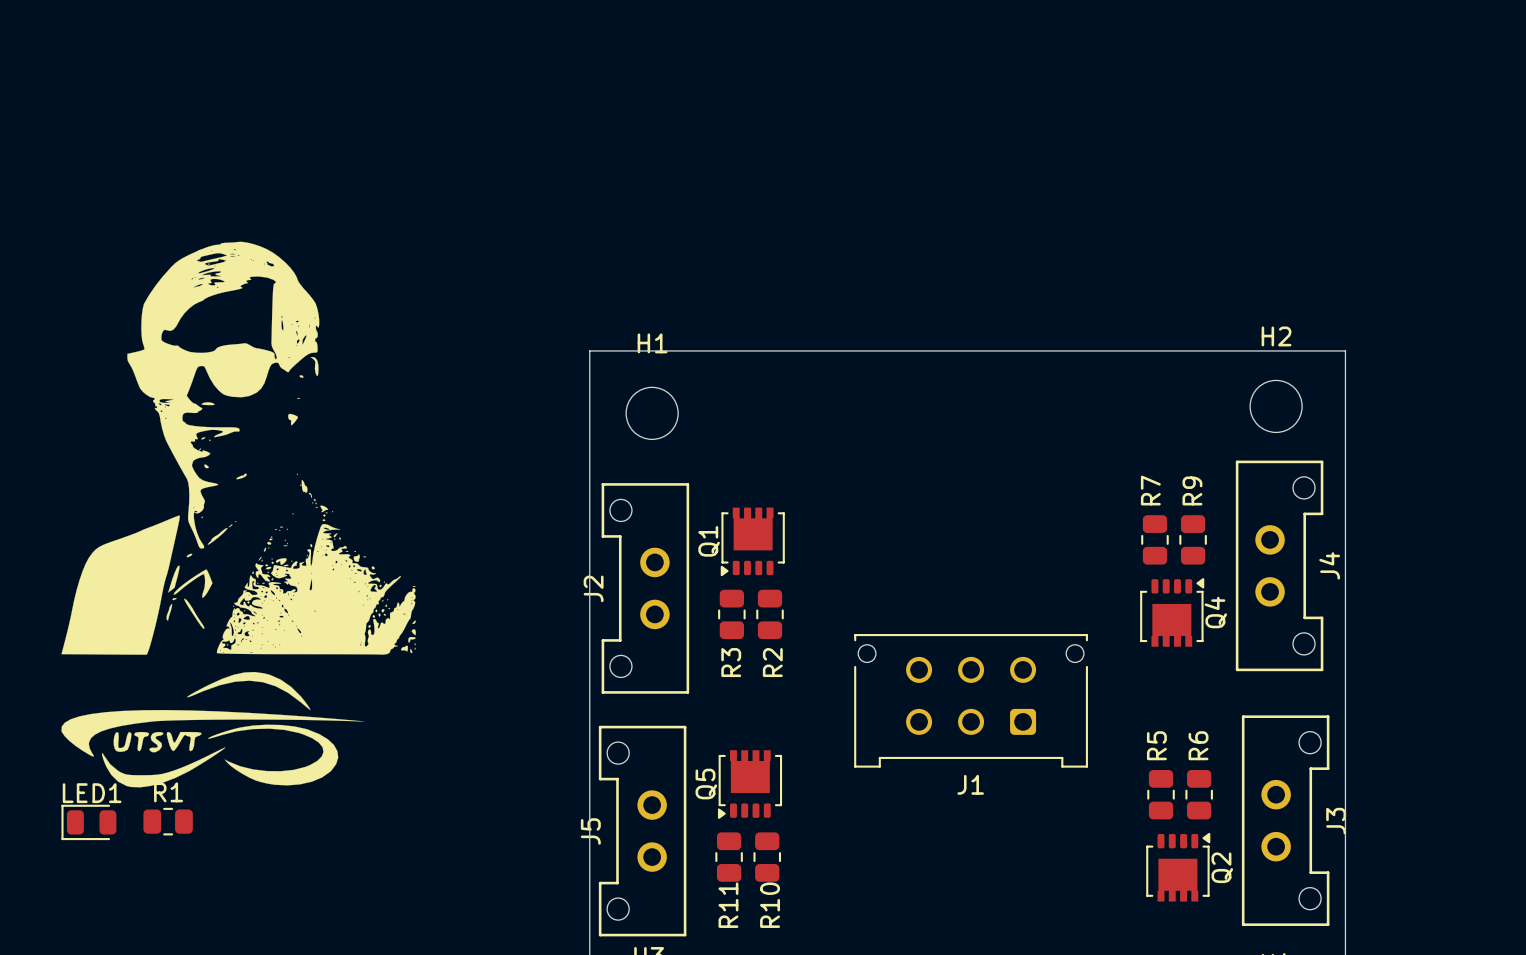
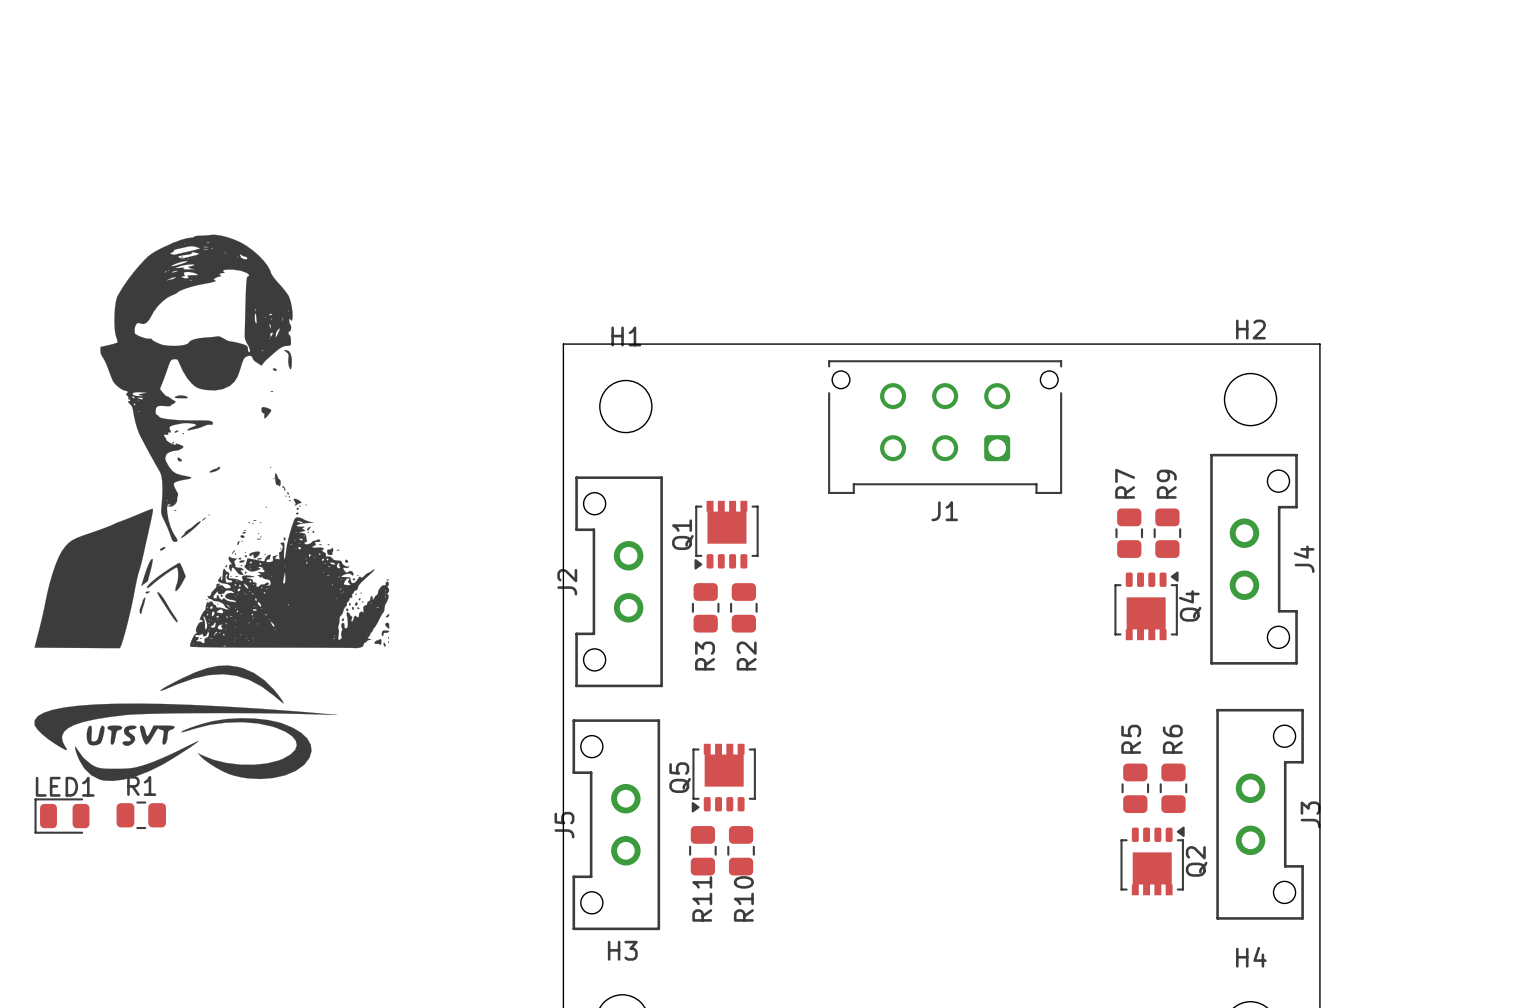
J1 position: (971, 700) -> (945, 427)

